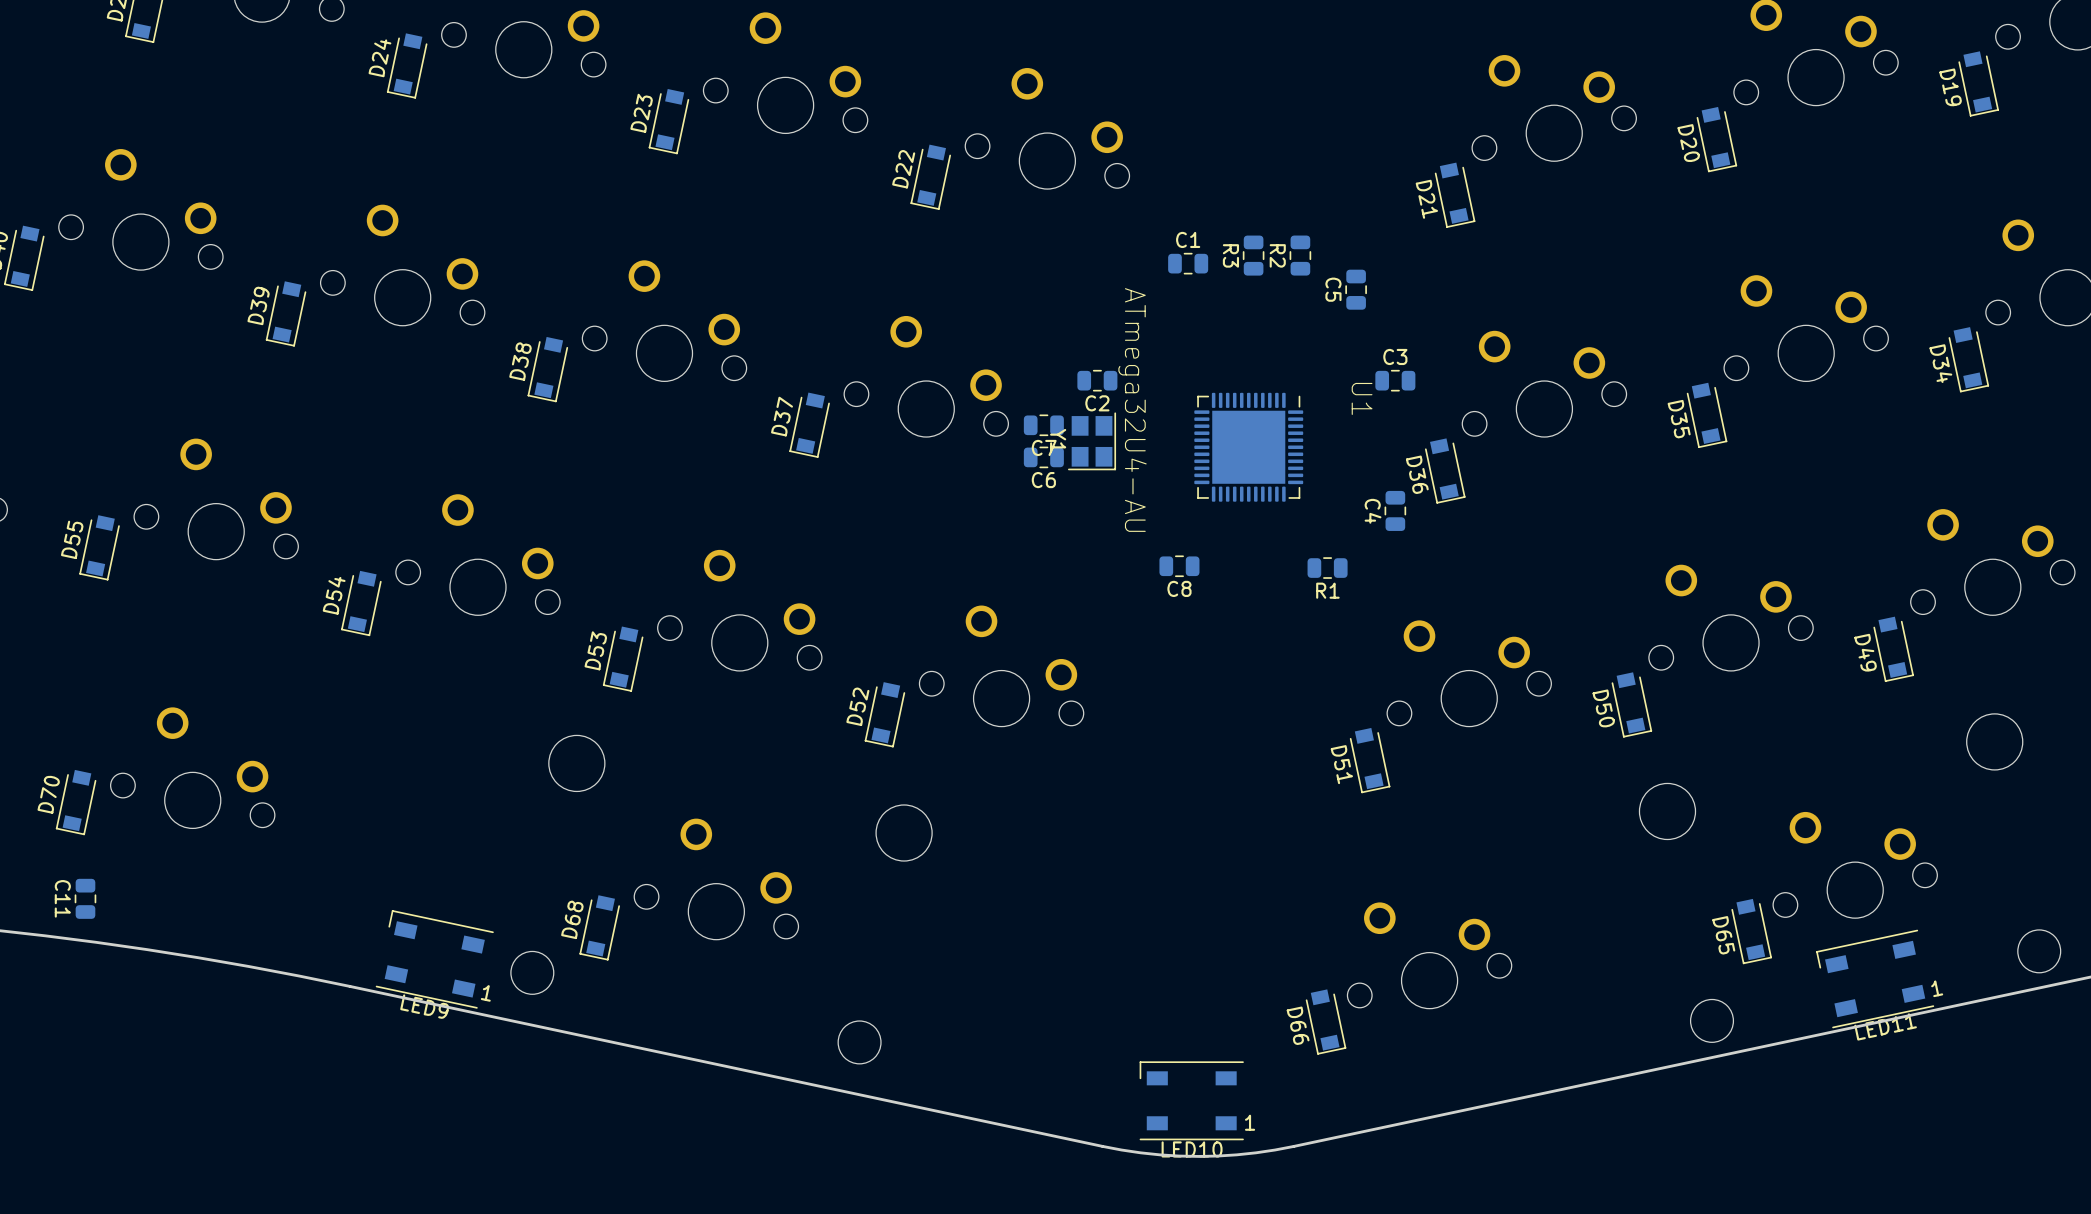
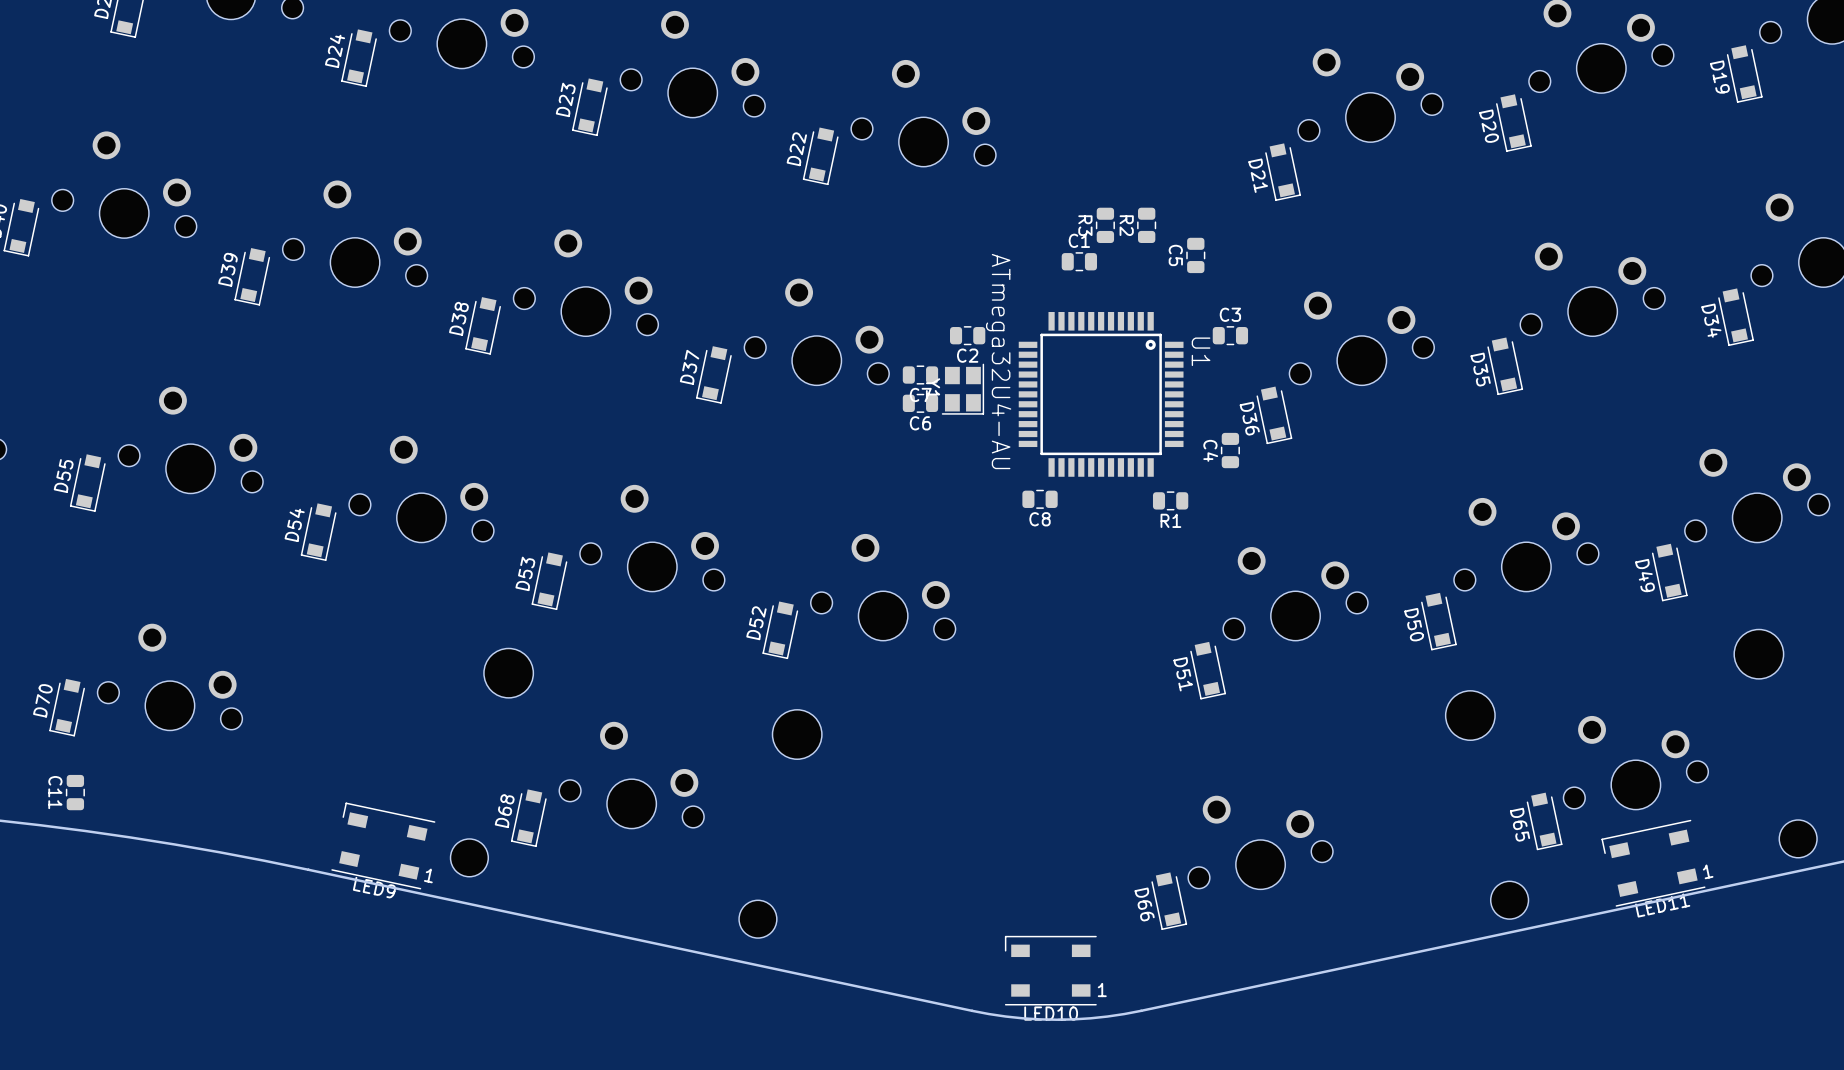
C1 position: (1188, 263) -> (1079, 261)
U1 footprint: [1194, 392, 1304, 502] -> [1018, 312, 1184, 477]

